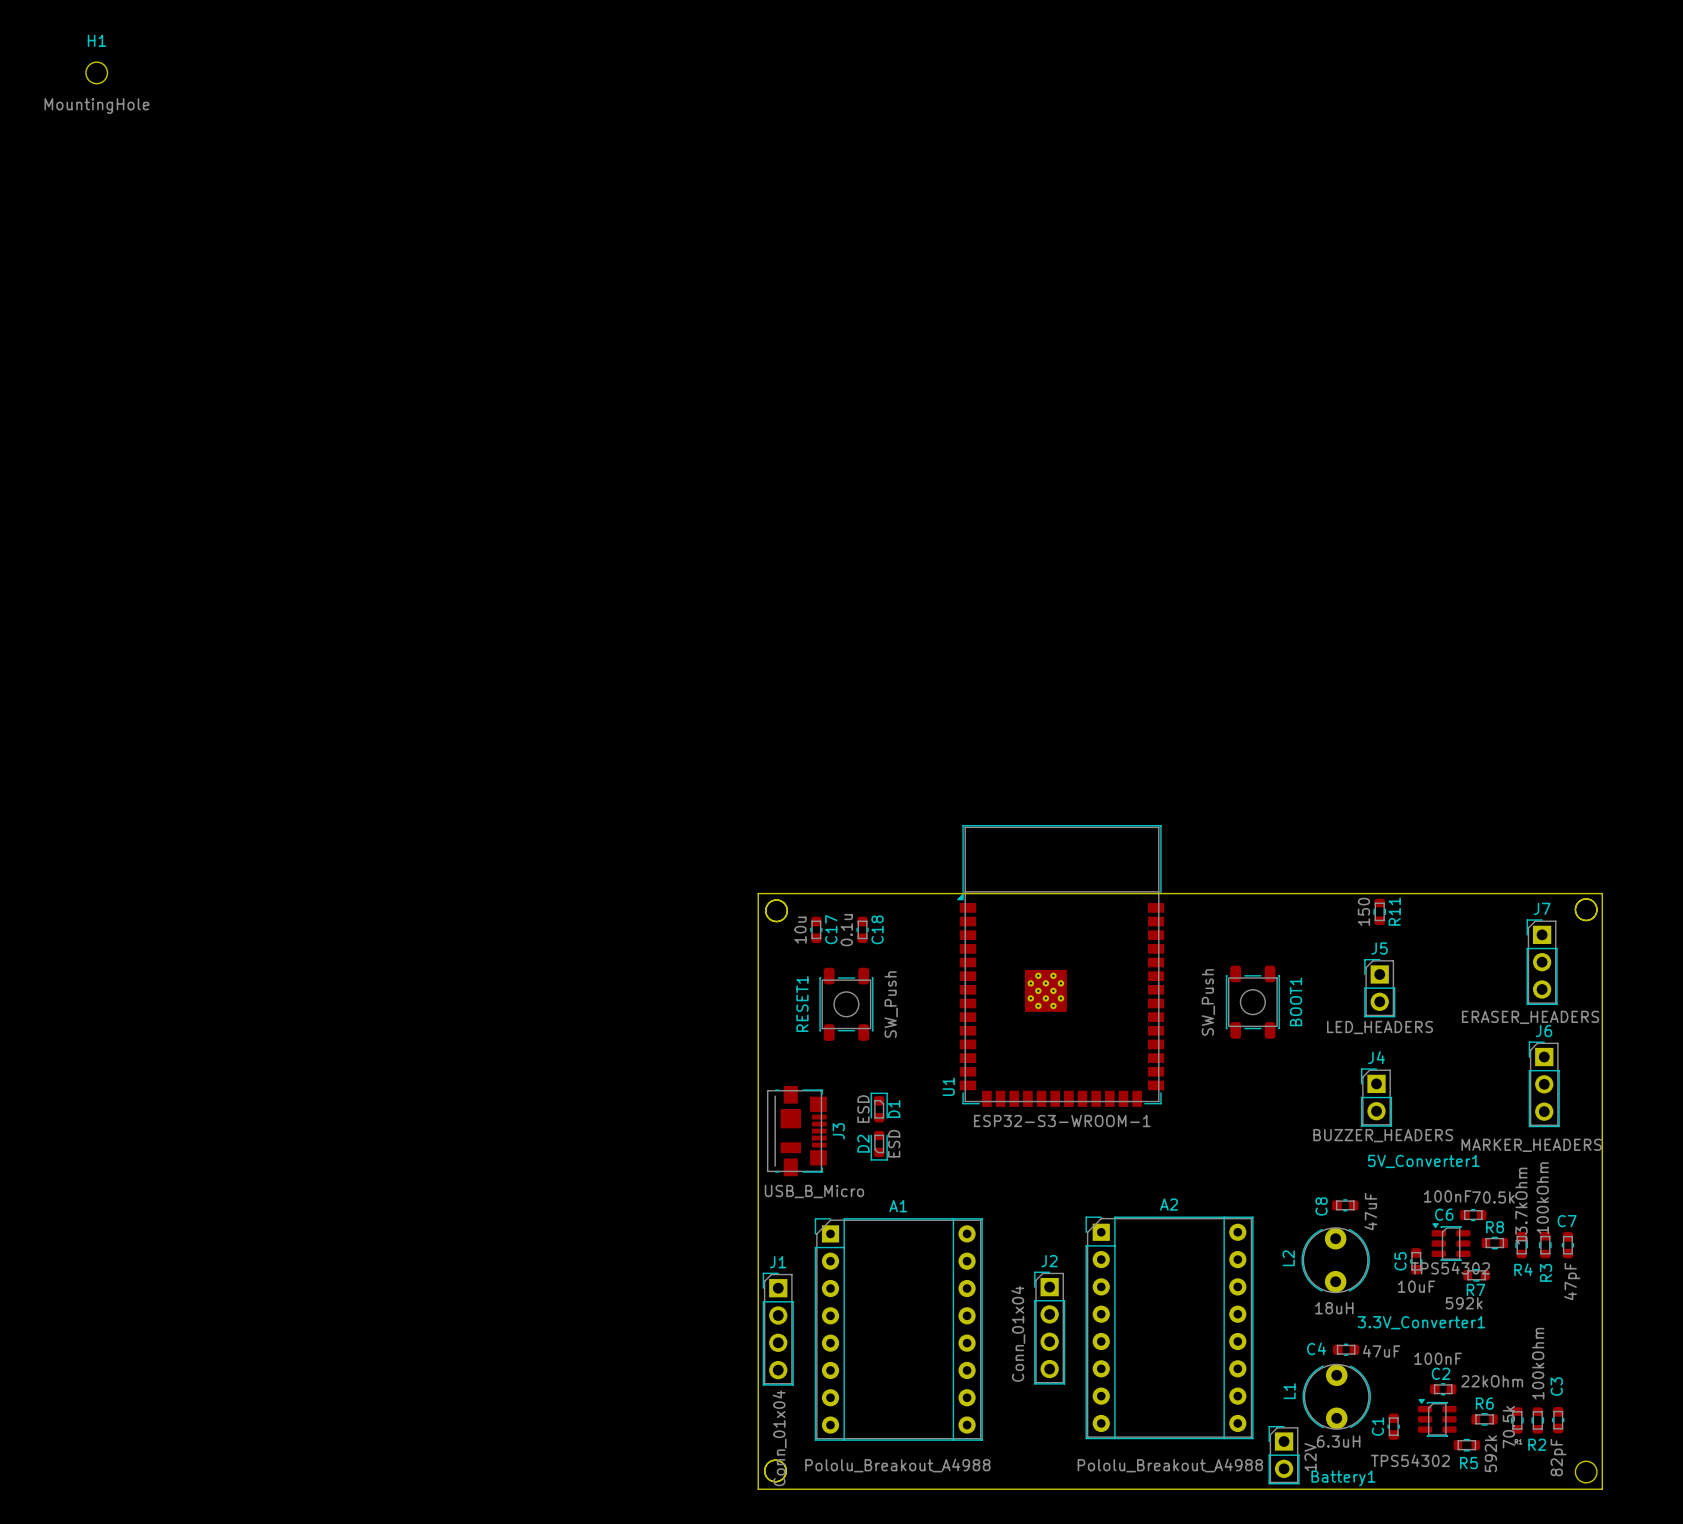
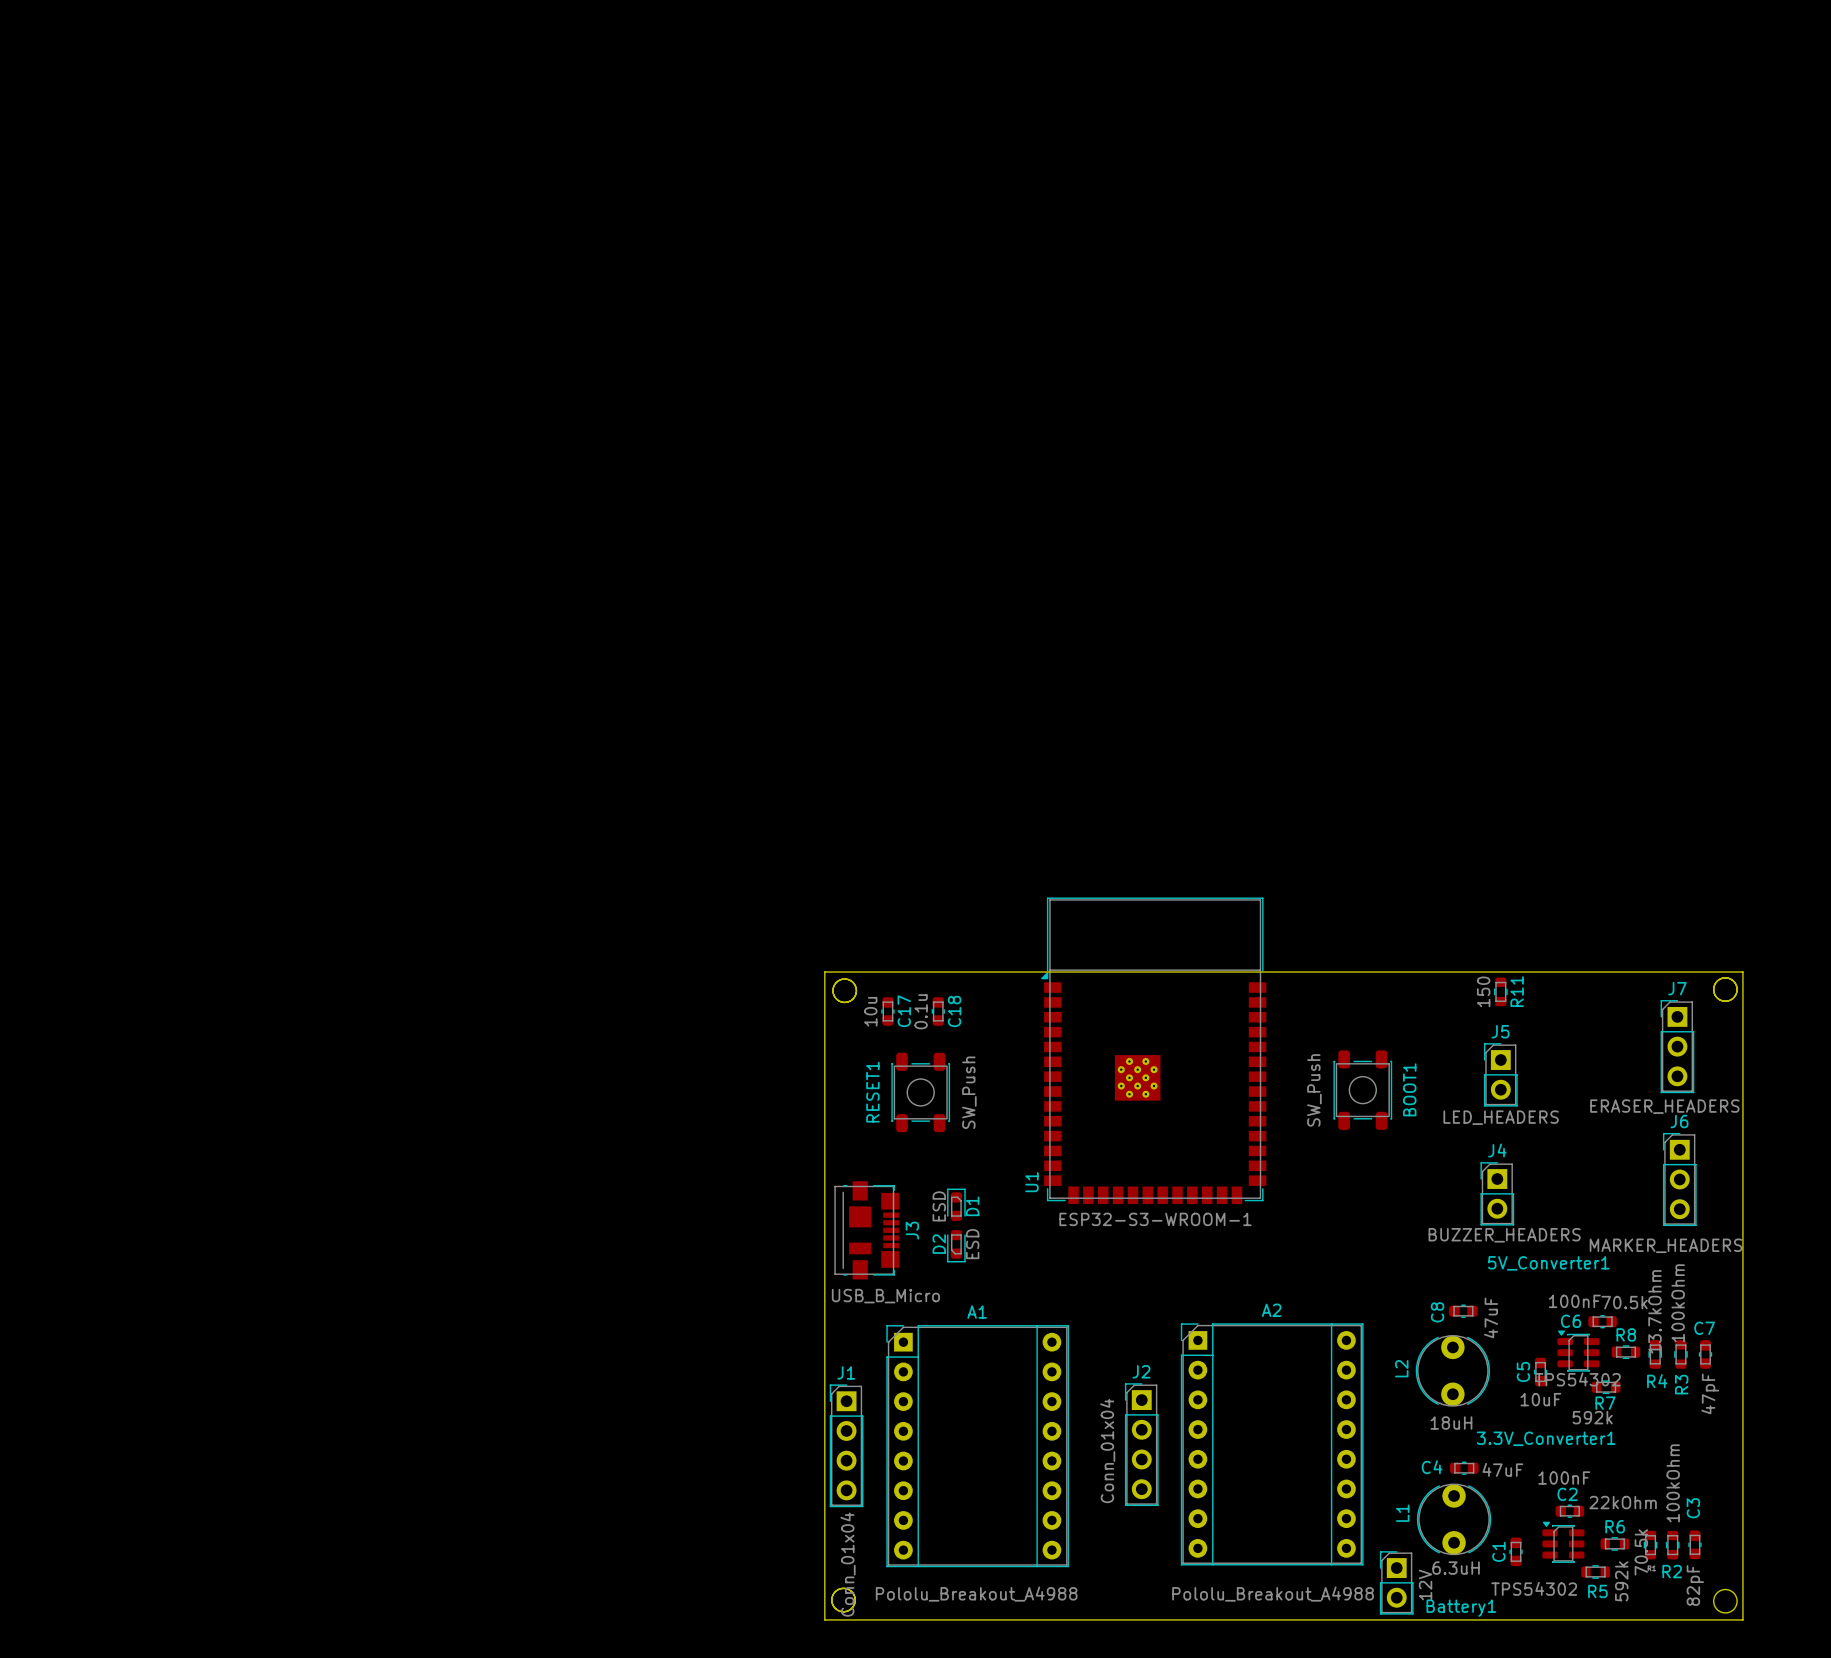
H1: MountingHole (96, 72) -> none

